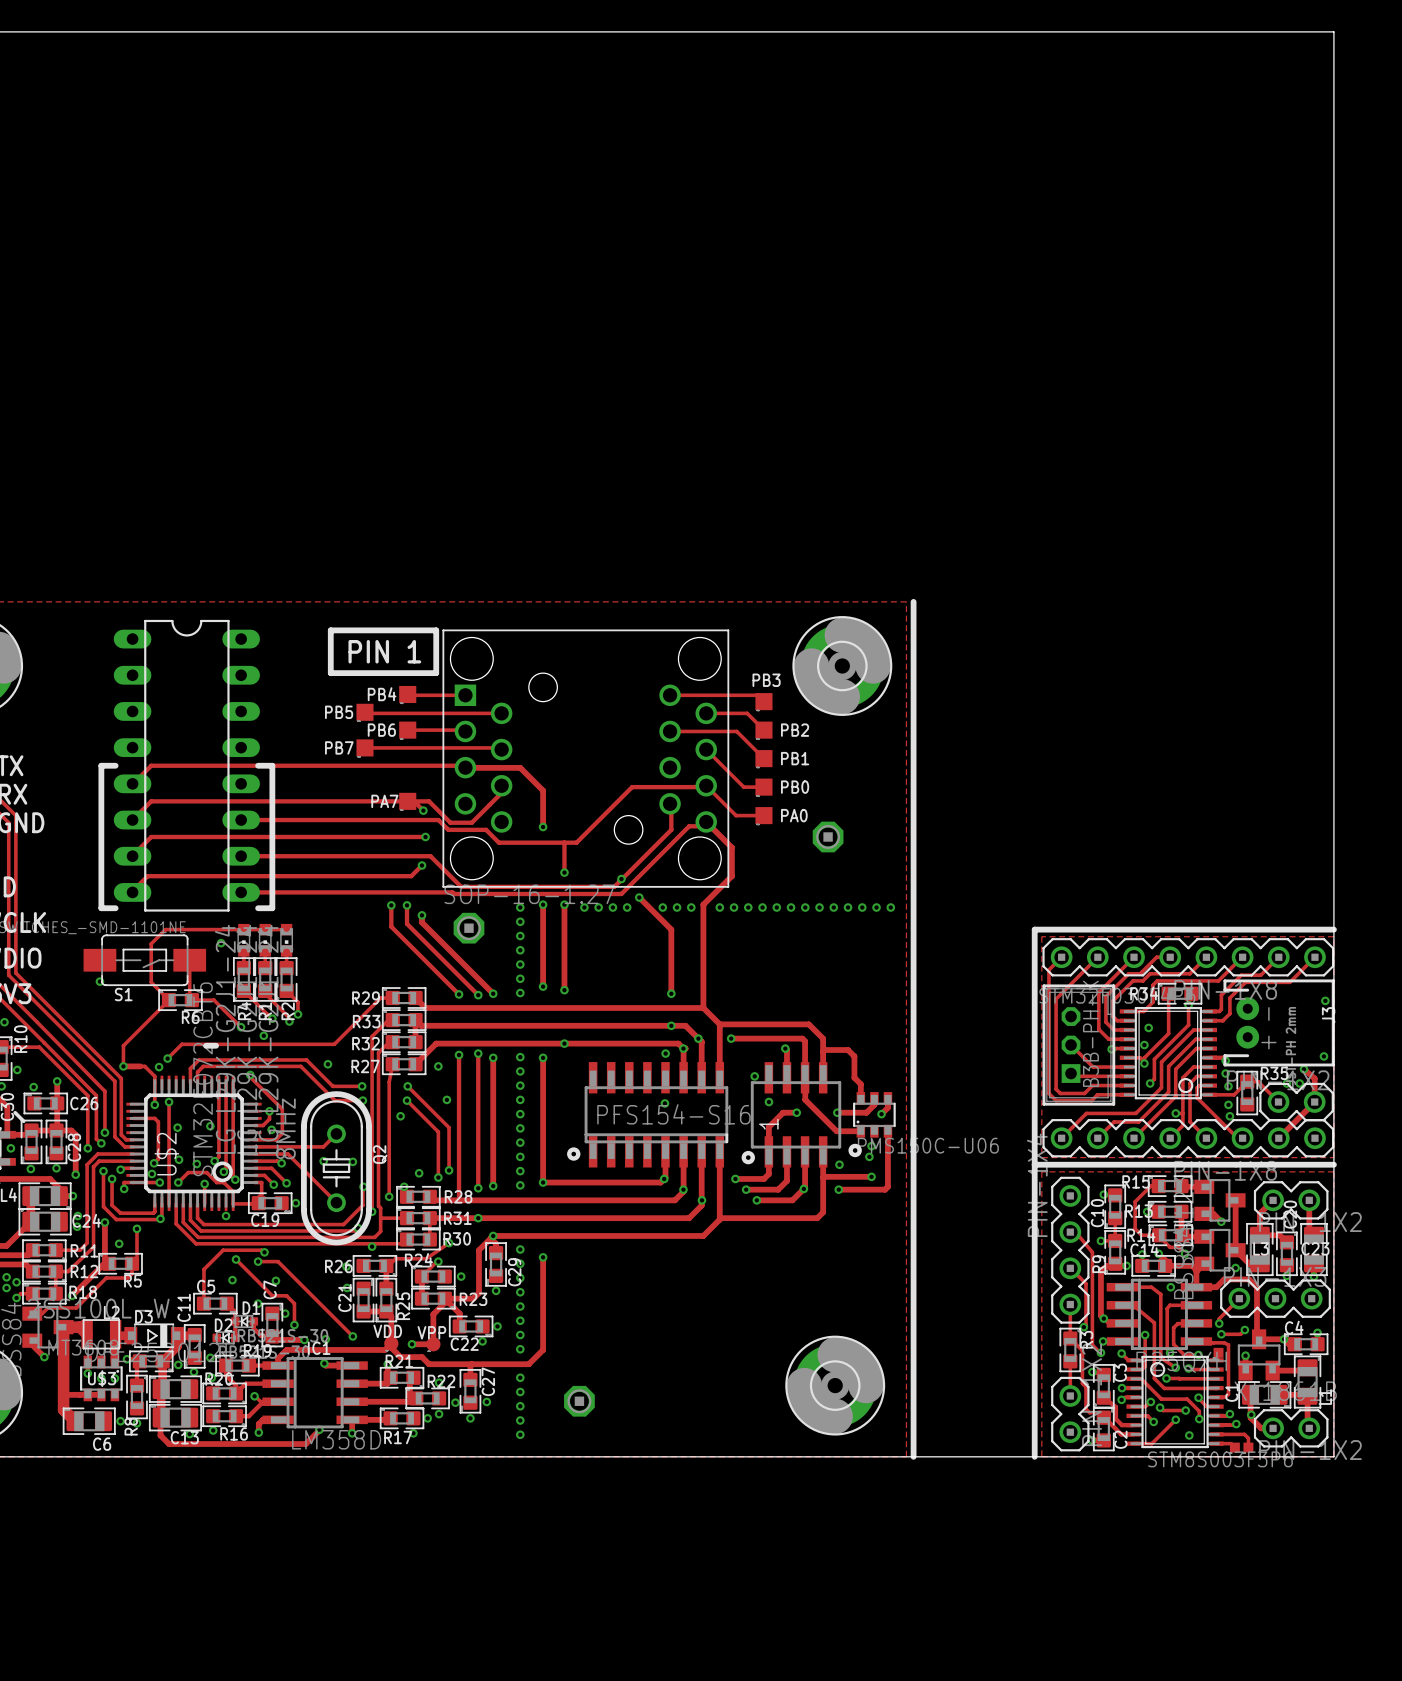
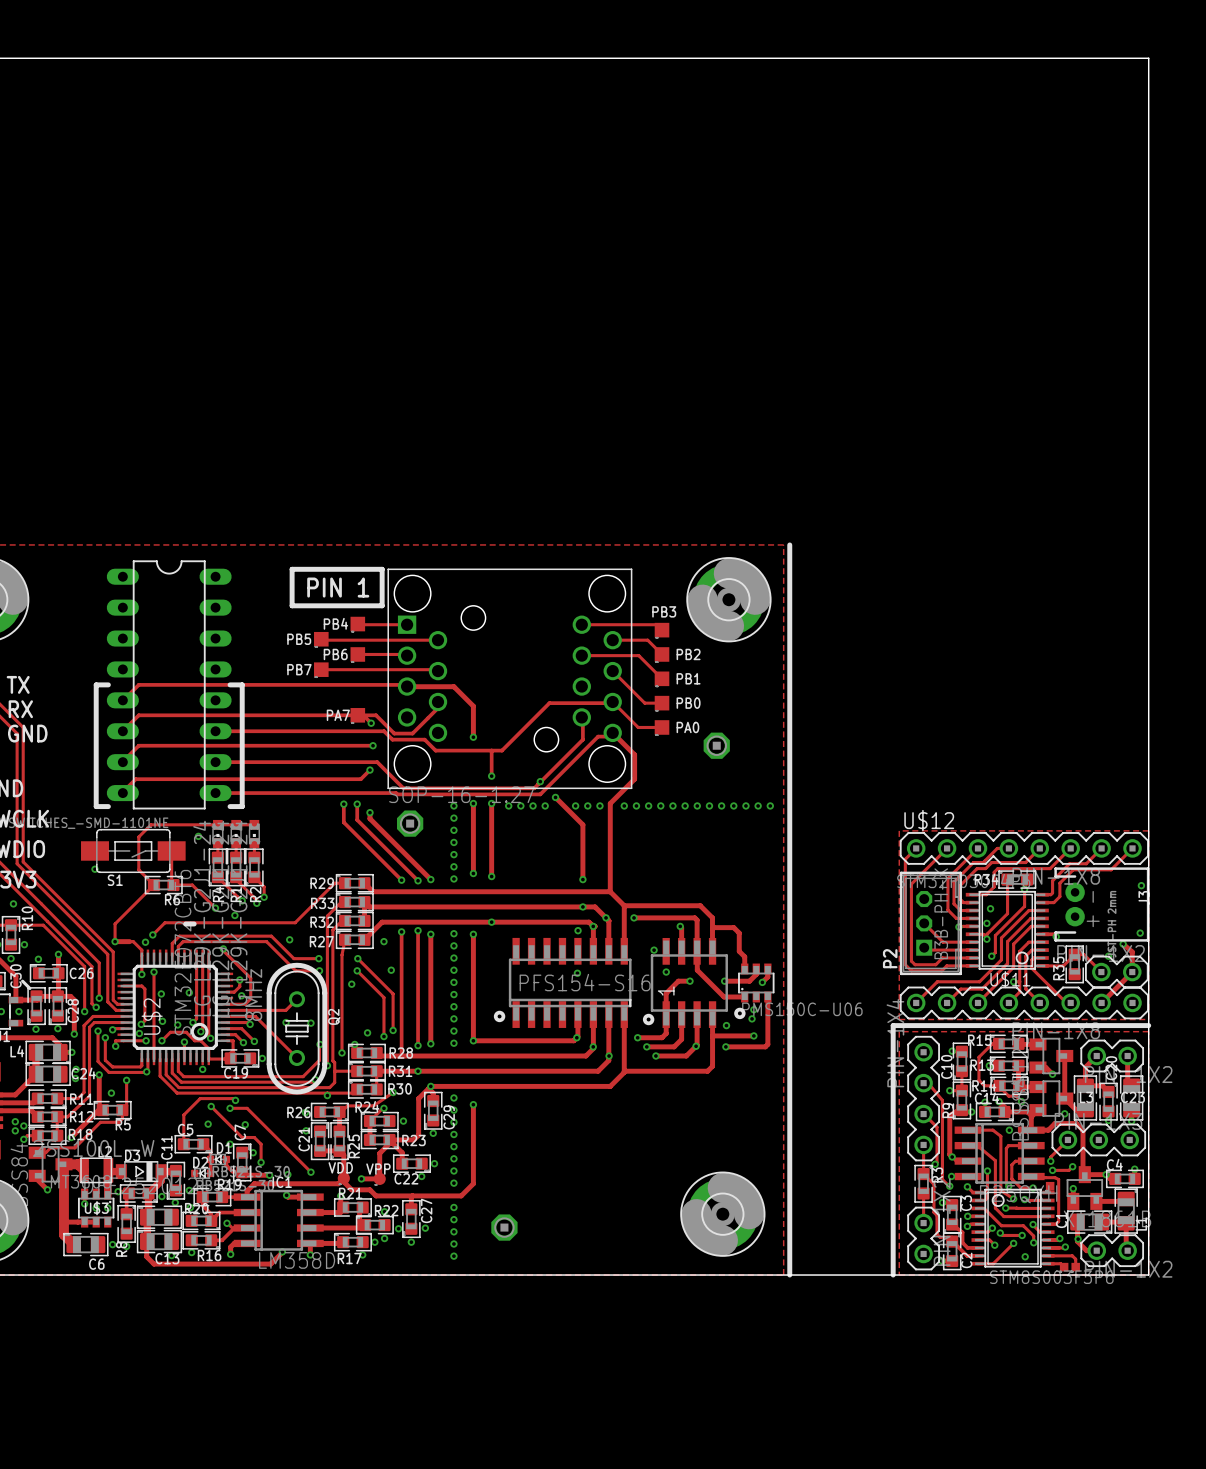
U$12 name: none -> U$12 (929, 820)
line: (1333, 929) (1034, 929) (1034, 1164) -> none
via: (1225, 1073) -> none
R35 name rotation: 0° (1274, 1073) -> 90° counterclockwise (1058, 968)
R35 name position: R35 (1274, 1073) -> R35 (1058, 968)
via: (1299, 1083) -> none
P2 name: none -> P2 (890, 958)
via: (1228, 1086) -> none
via: (1228, 1104) -> none
U$11 name: none -> U$11 (1010, 979)
via: (1229, 1116) -> none

